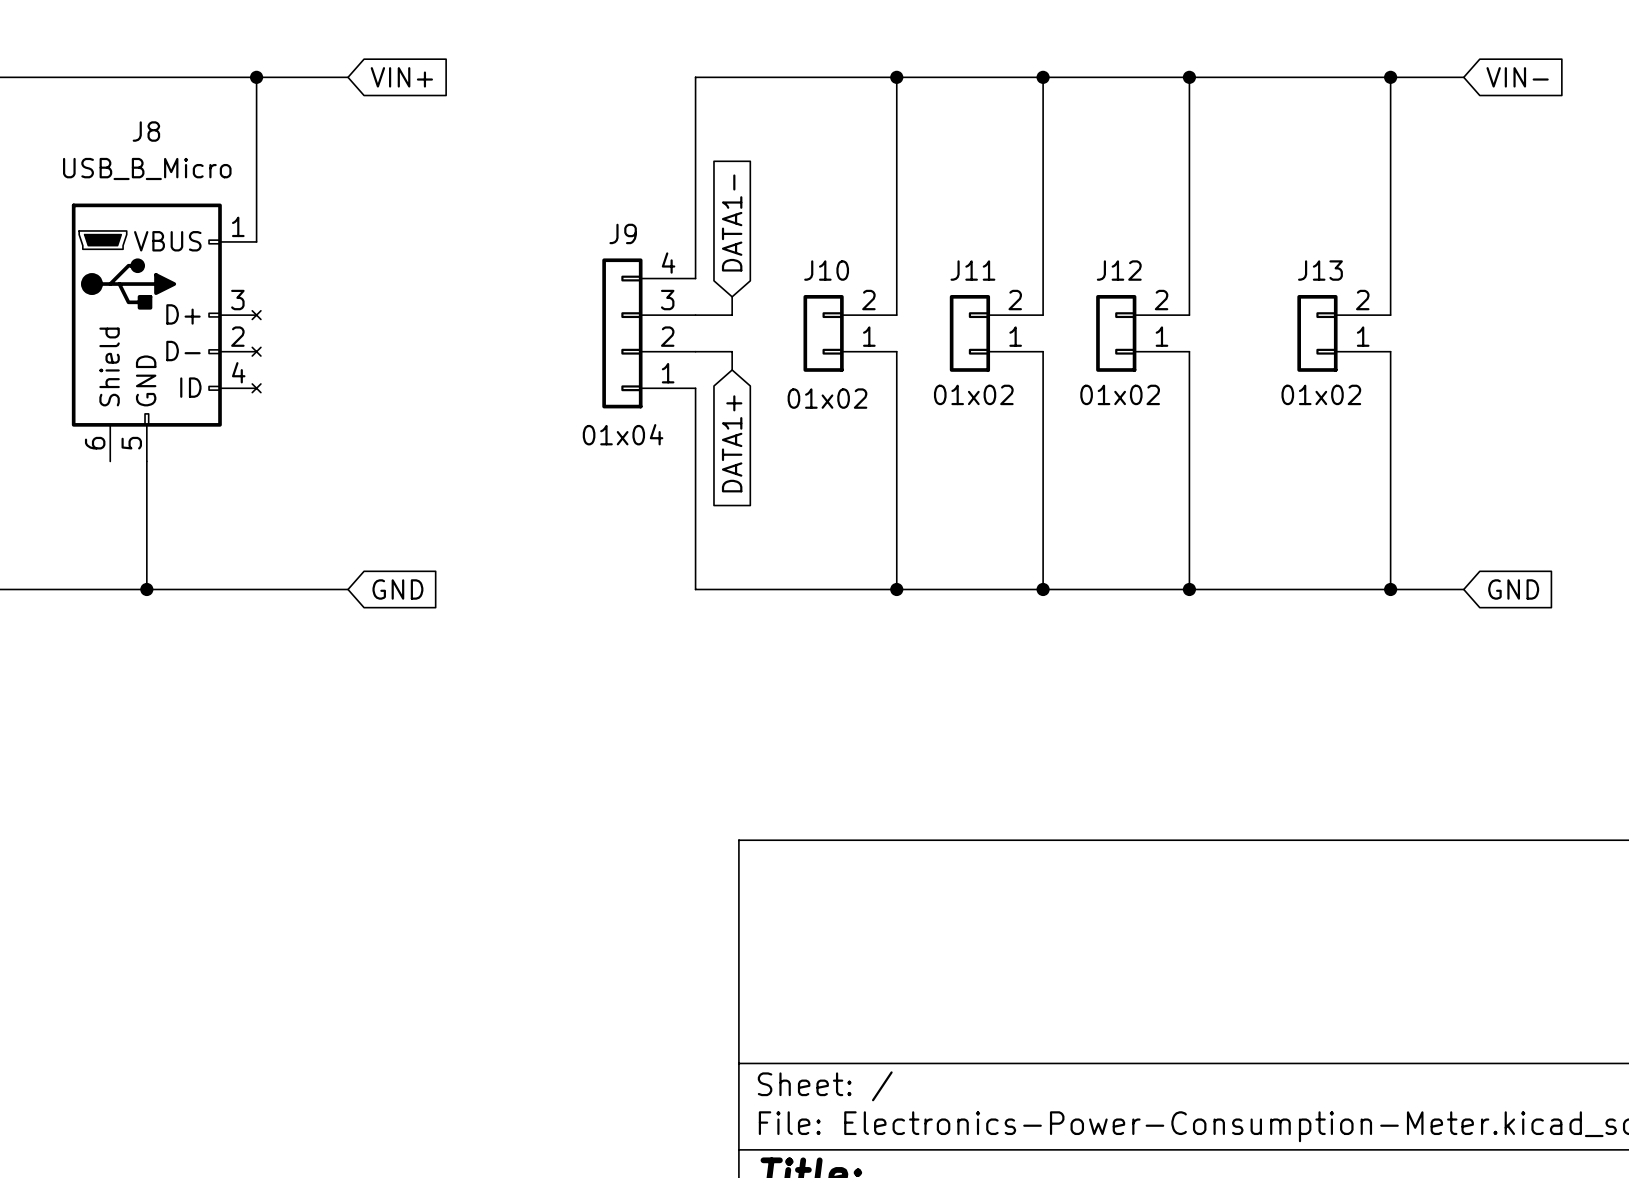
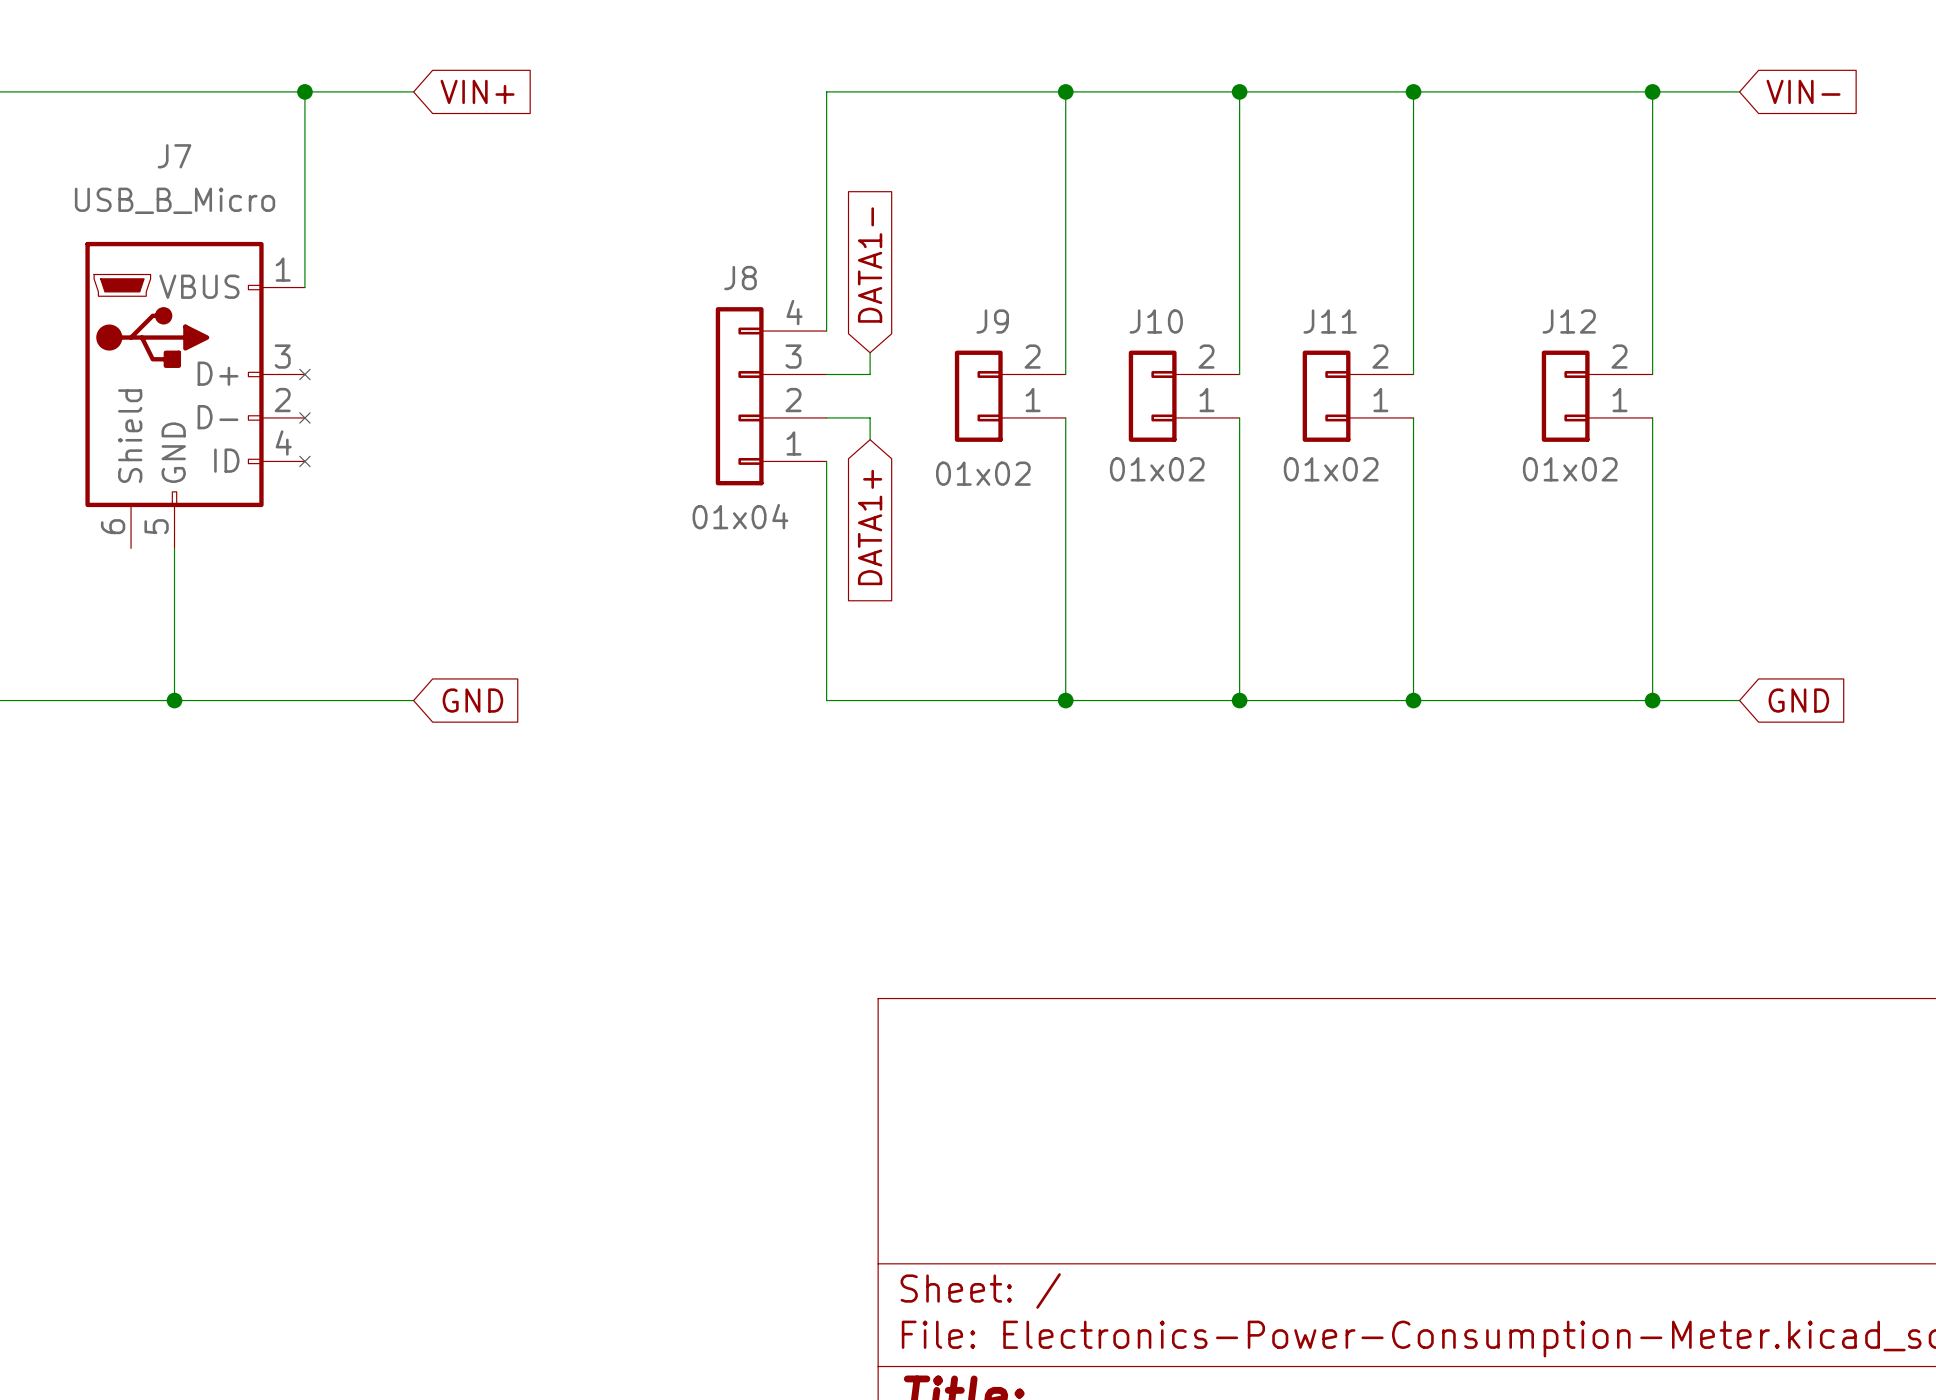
J8 name: J8 (146, 131) -> J7 (174, 156)
J9 name: J9 (623, 233) -> J8 (740, 278)
J10 name: J10 (826, 270) -> J9 (992, 321)
J11 name: J11 (972, 270) -> J10 (1156, 321)
J12 name: J12 (1119, 270) -> J11 (1330, 321)
J13 name: J13 (1320, 270) -> J12 (1569, 321)

